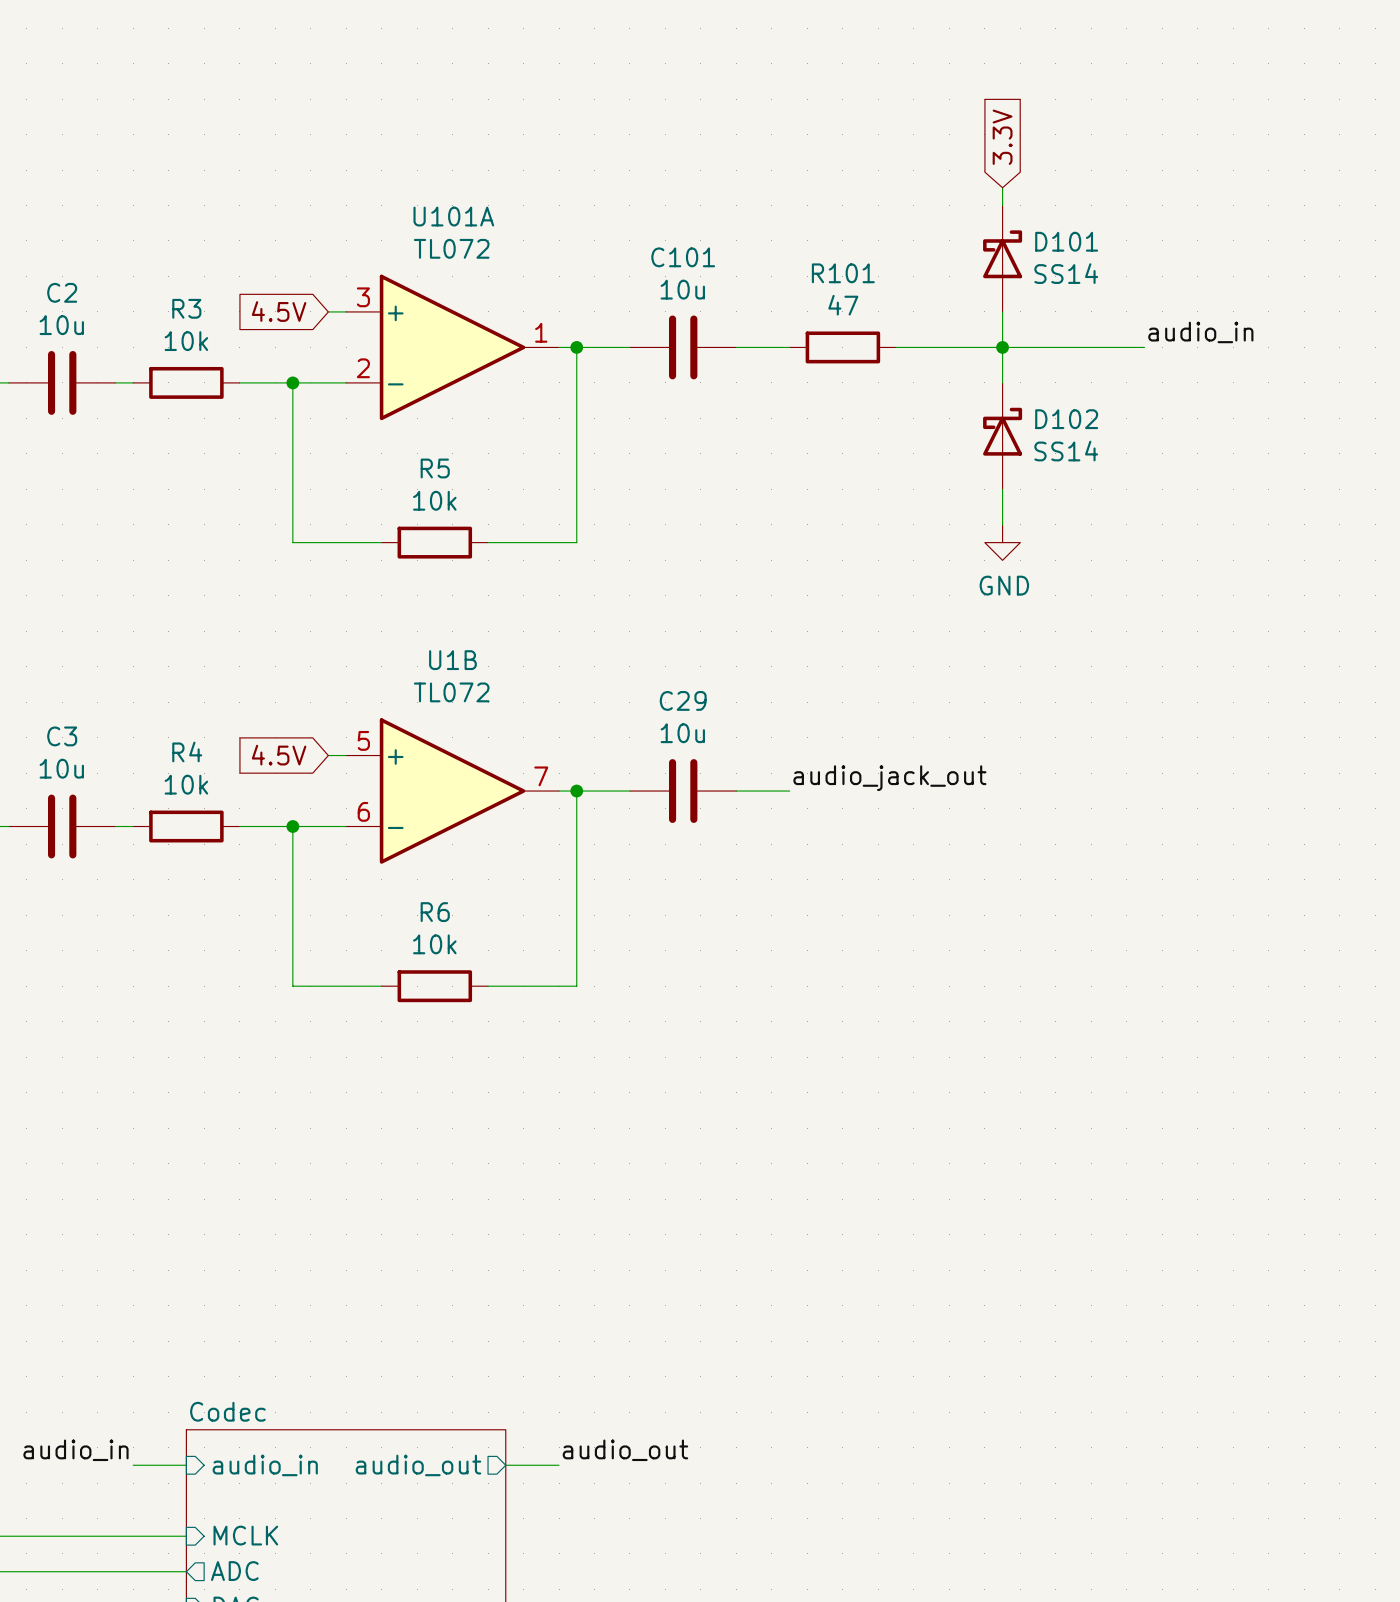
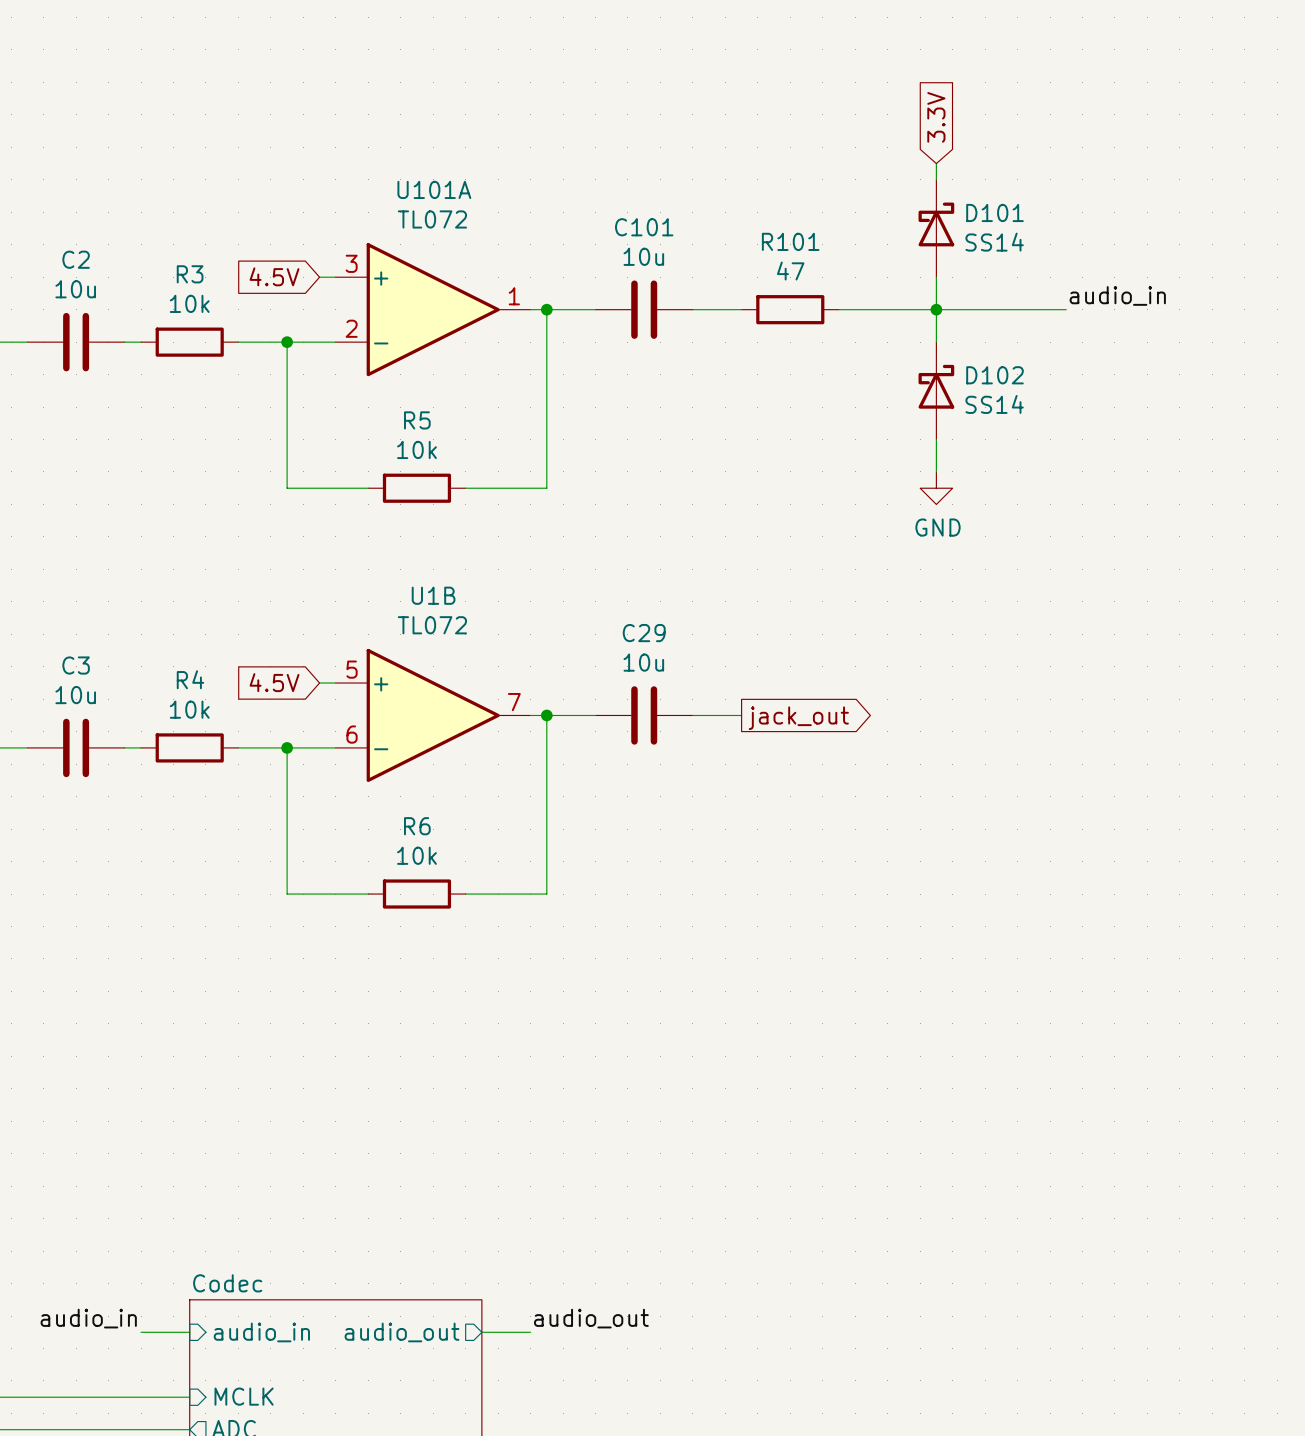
label: audio_jack_out (889, 778) -> none
global label: none -> jack_out (798, 718)

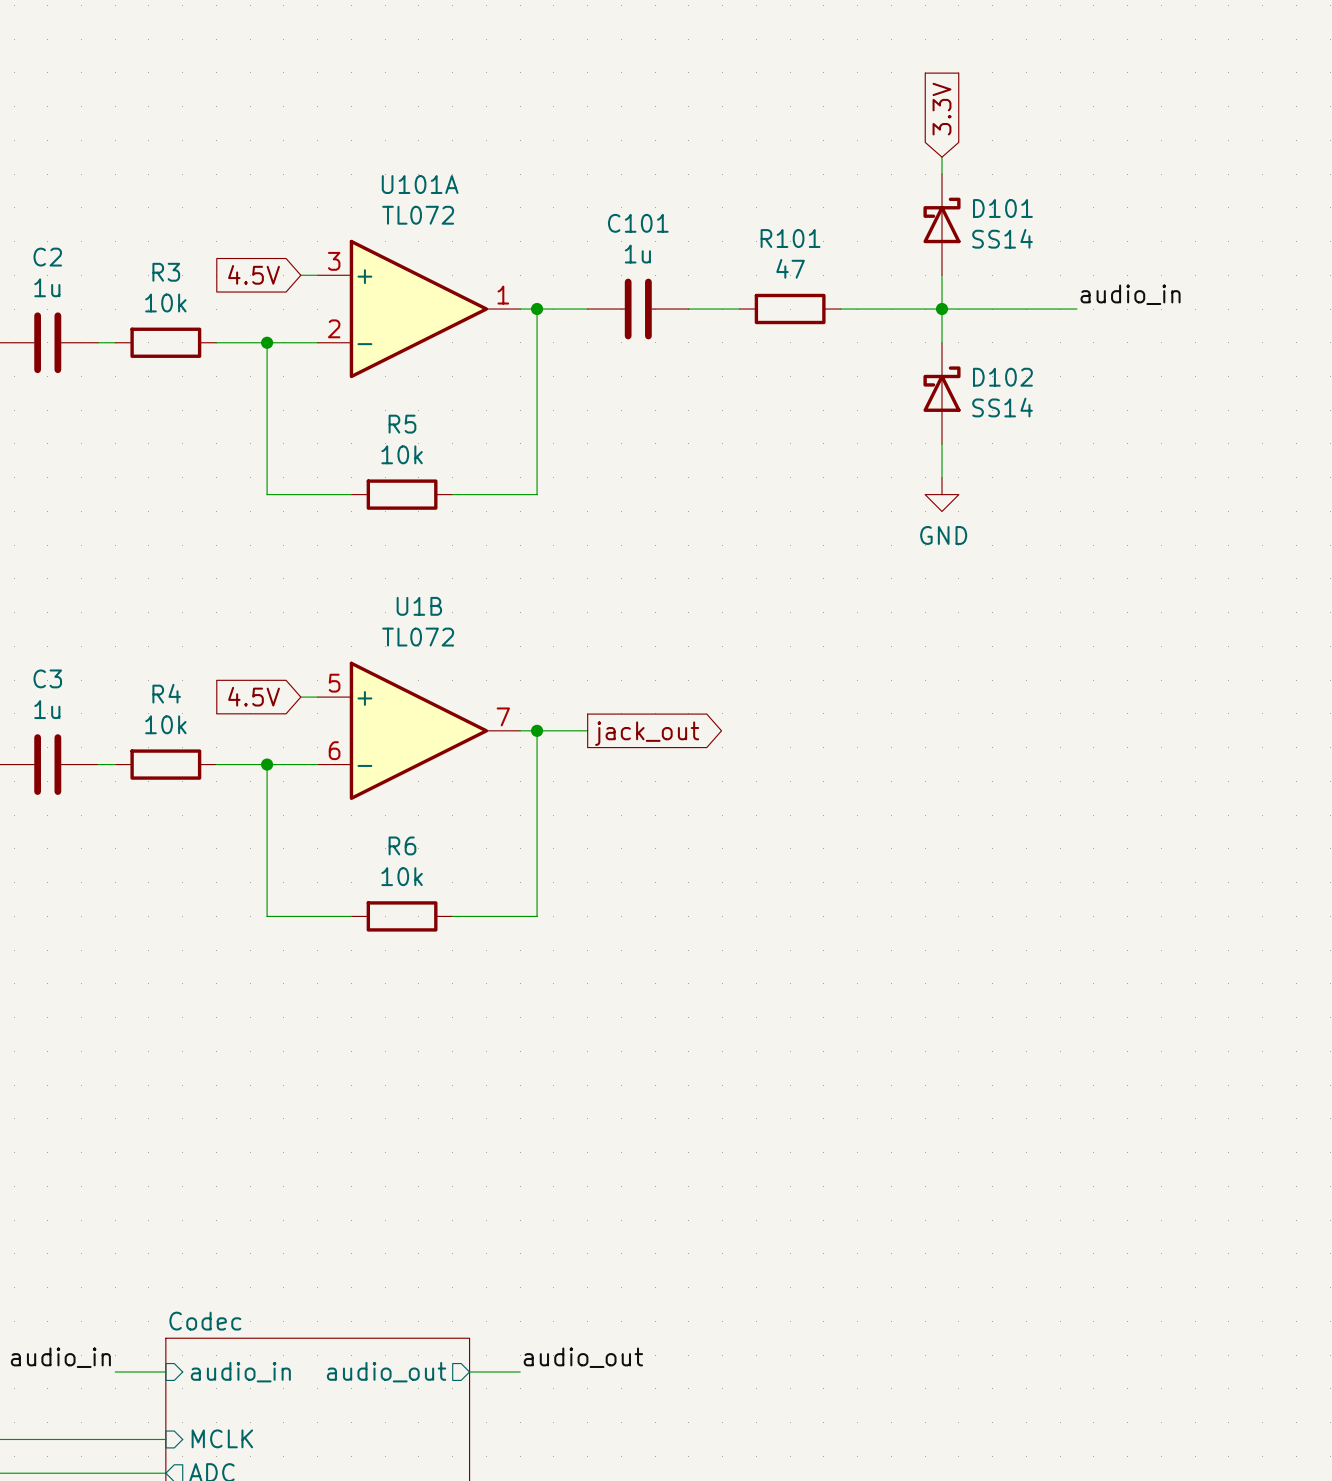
C101 value: 10u (643, 256) -> 1u (637, 254)
C2 value: 10u (75, 289) -> 1u (47, 287)
C3 value: 10u (75, 695) -> 1u (47, 709)
C29: 10u (644, 715) -> none
wire: (692, 715) (741, 715) -> none
global label position: jack_out (798, 718) -> jack_out (647, 733)

